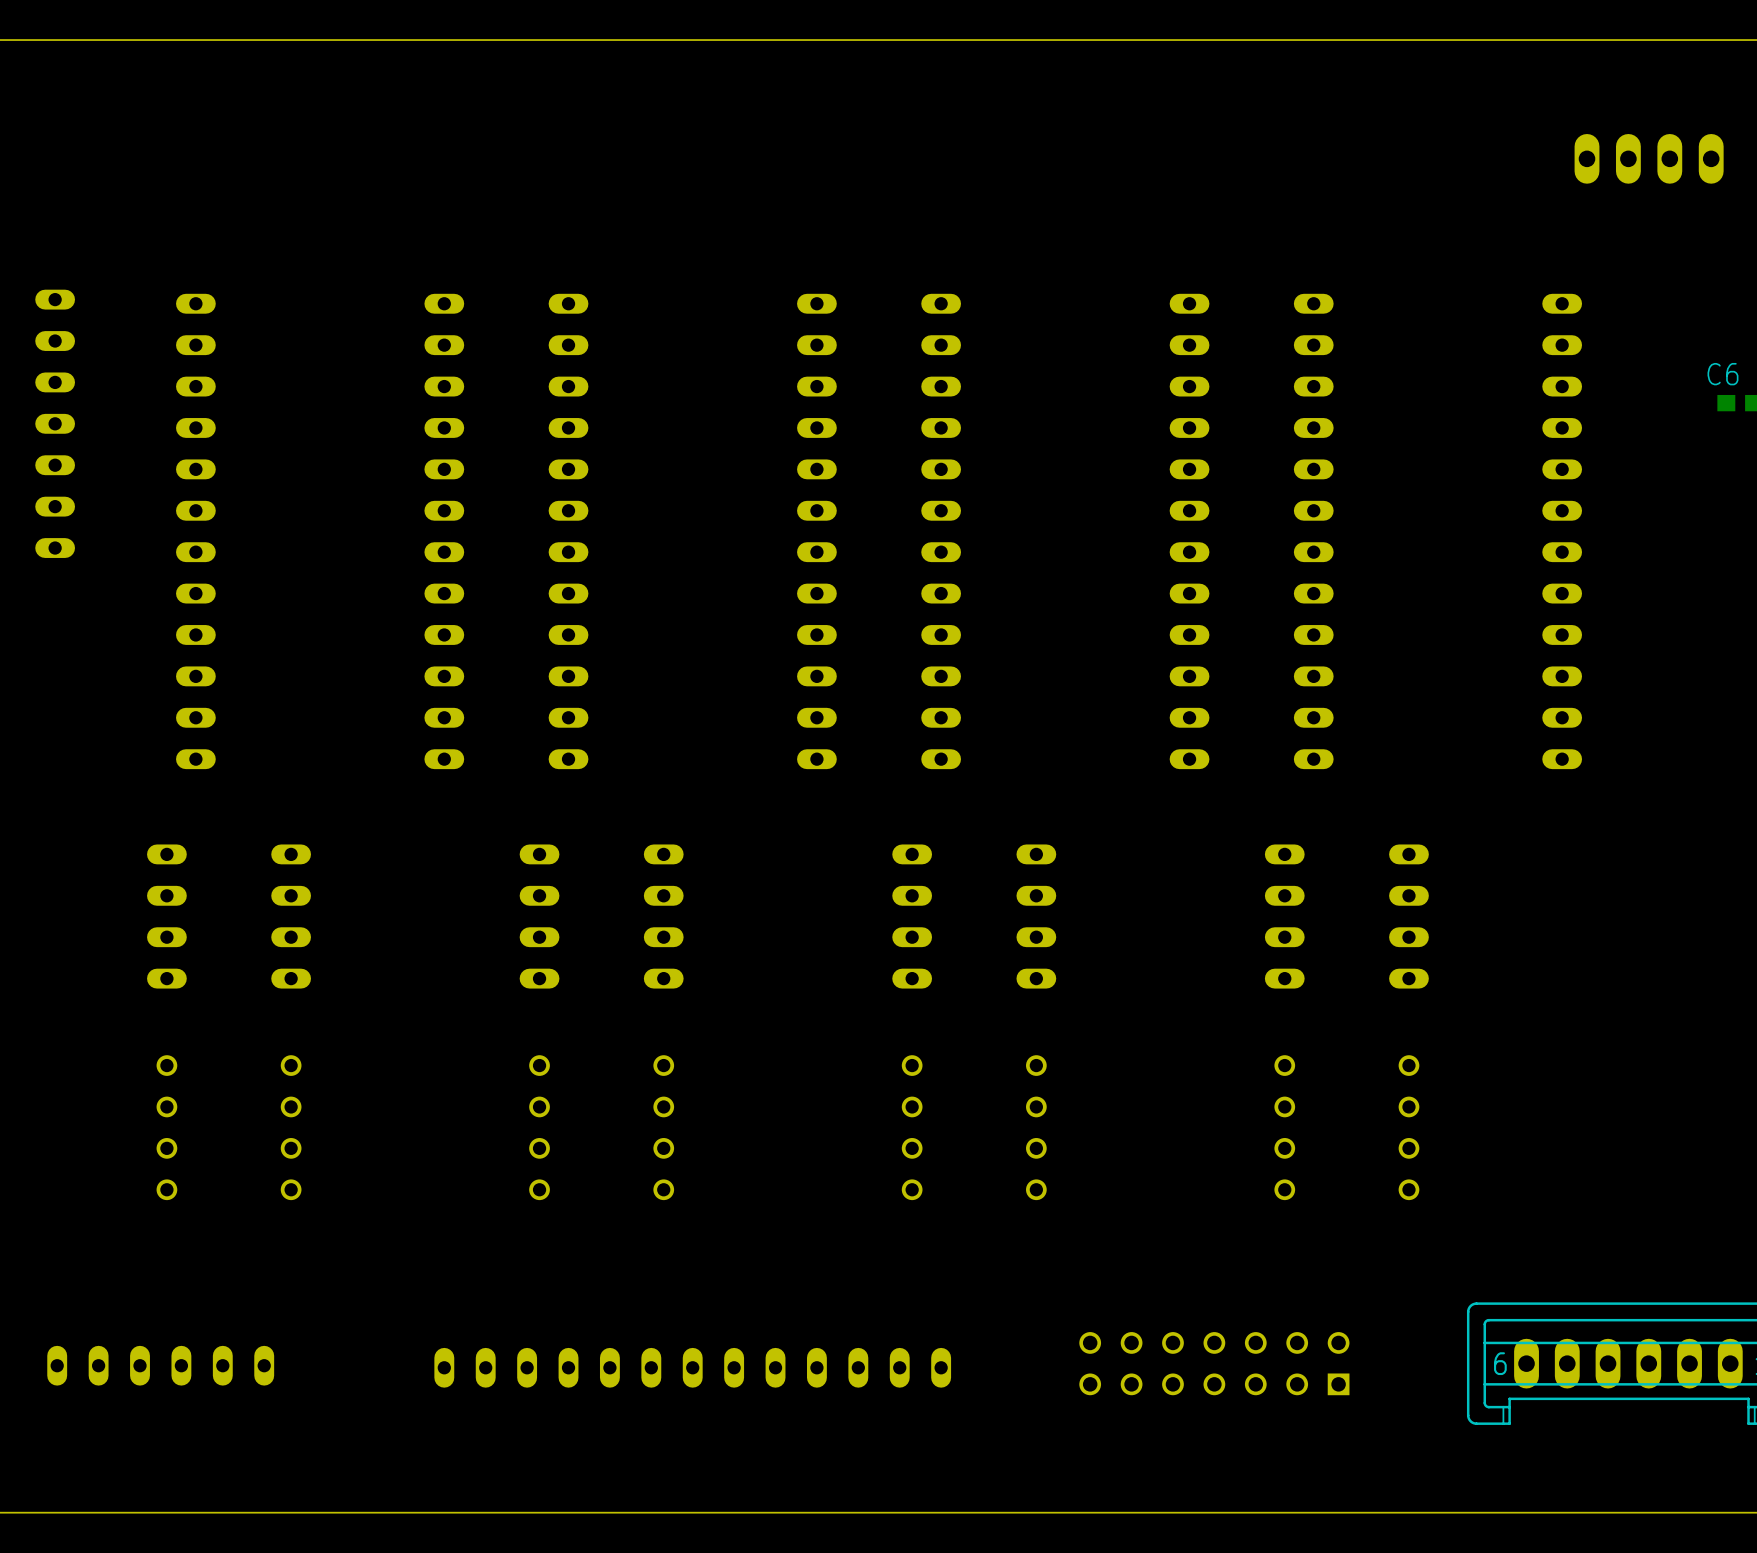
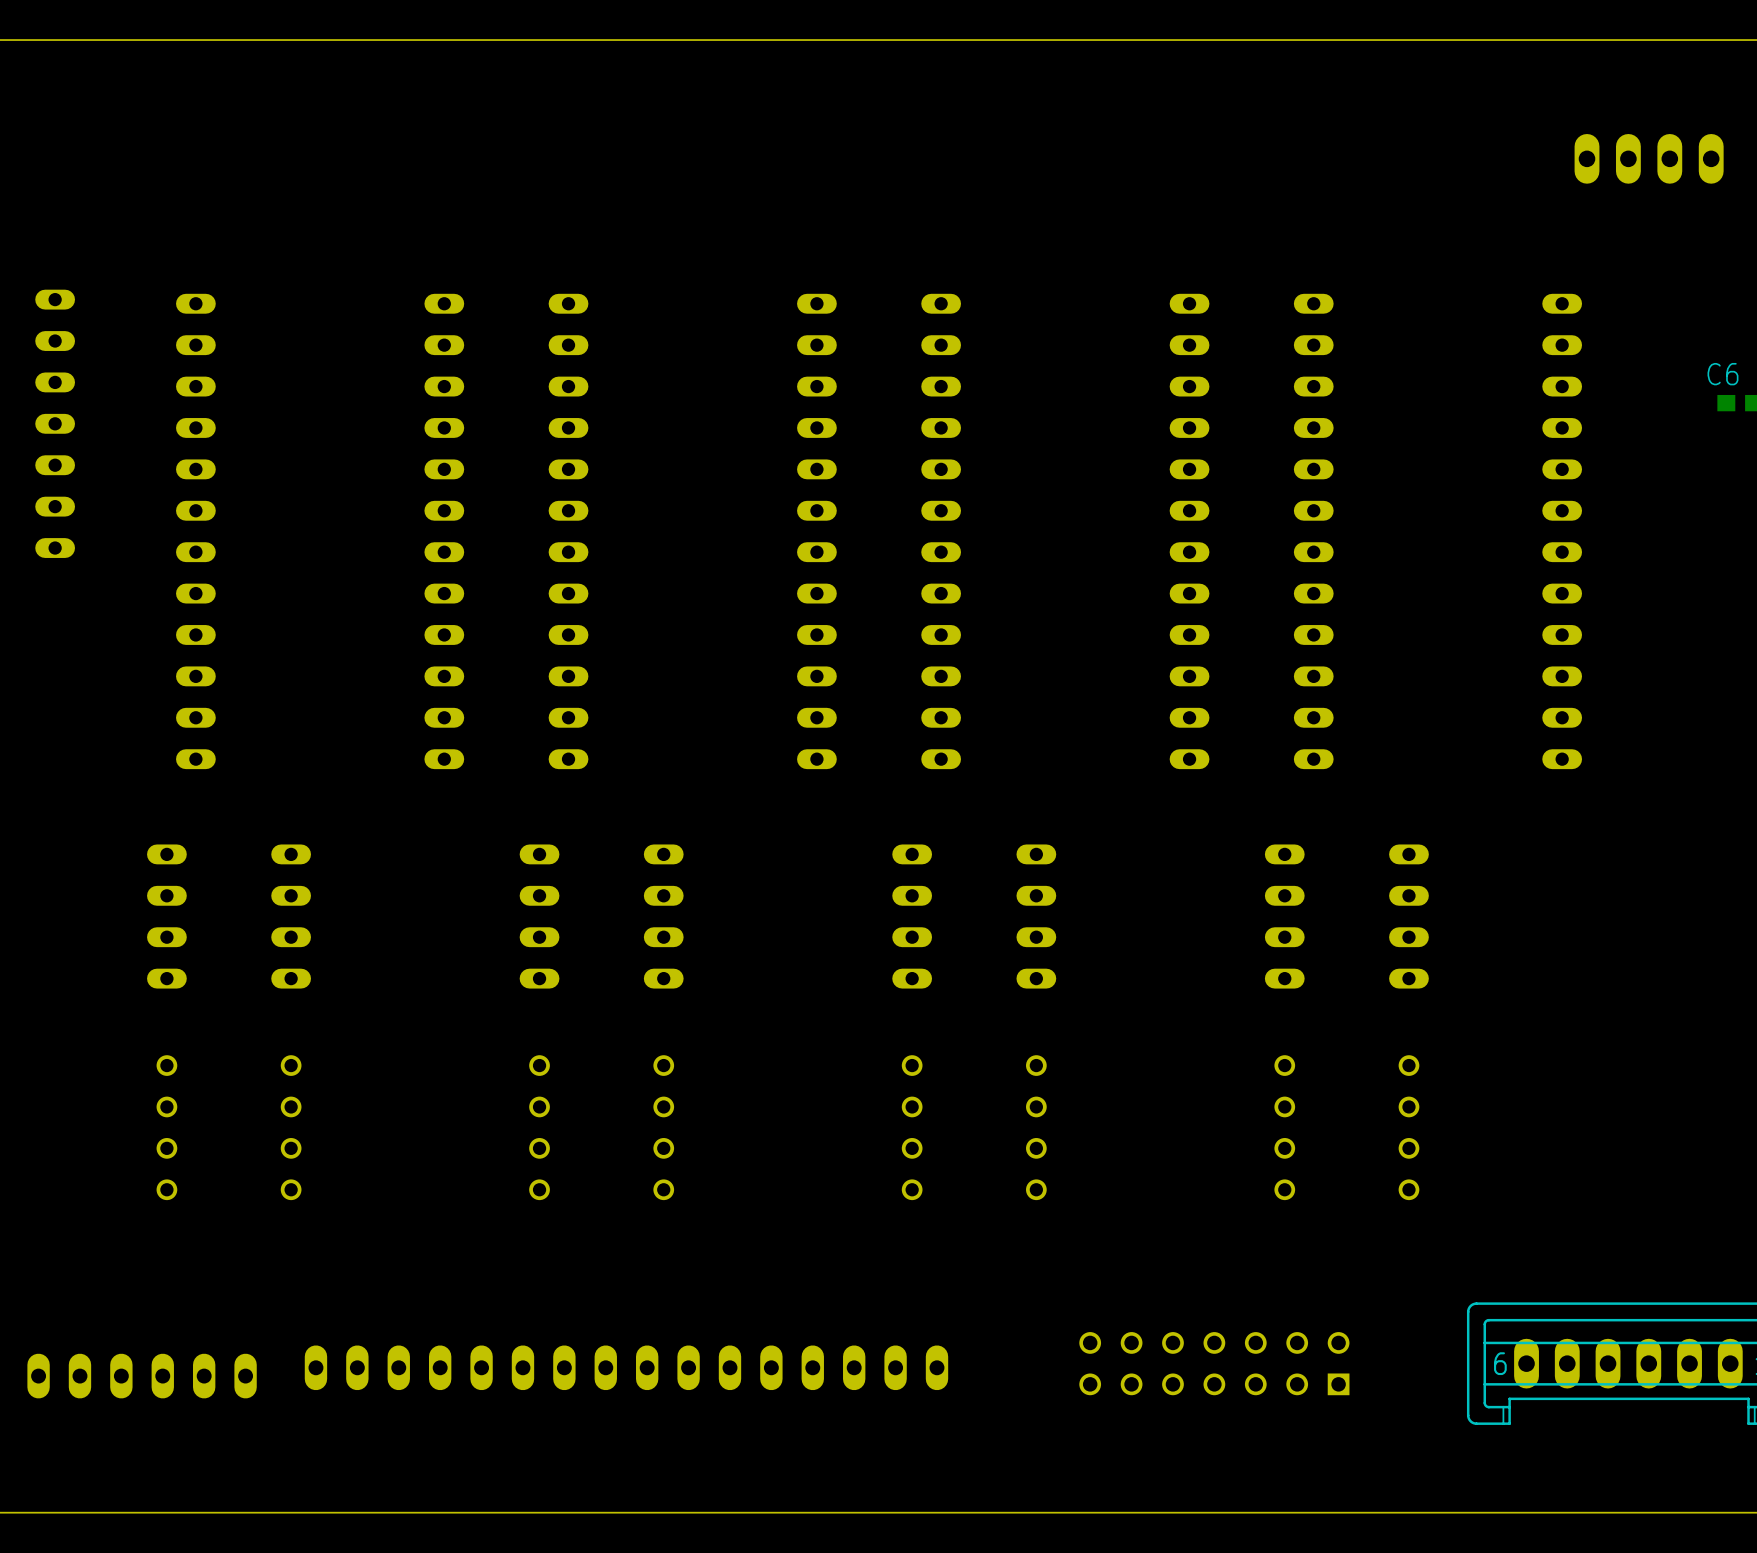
part: (160, 1365) -> none
part: none -> (626, 1367)
part: (692, 1367) -> none
part: none -> (142, 1376)

